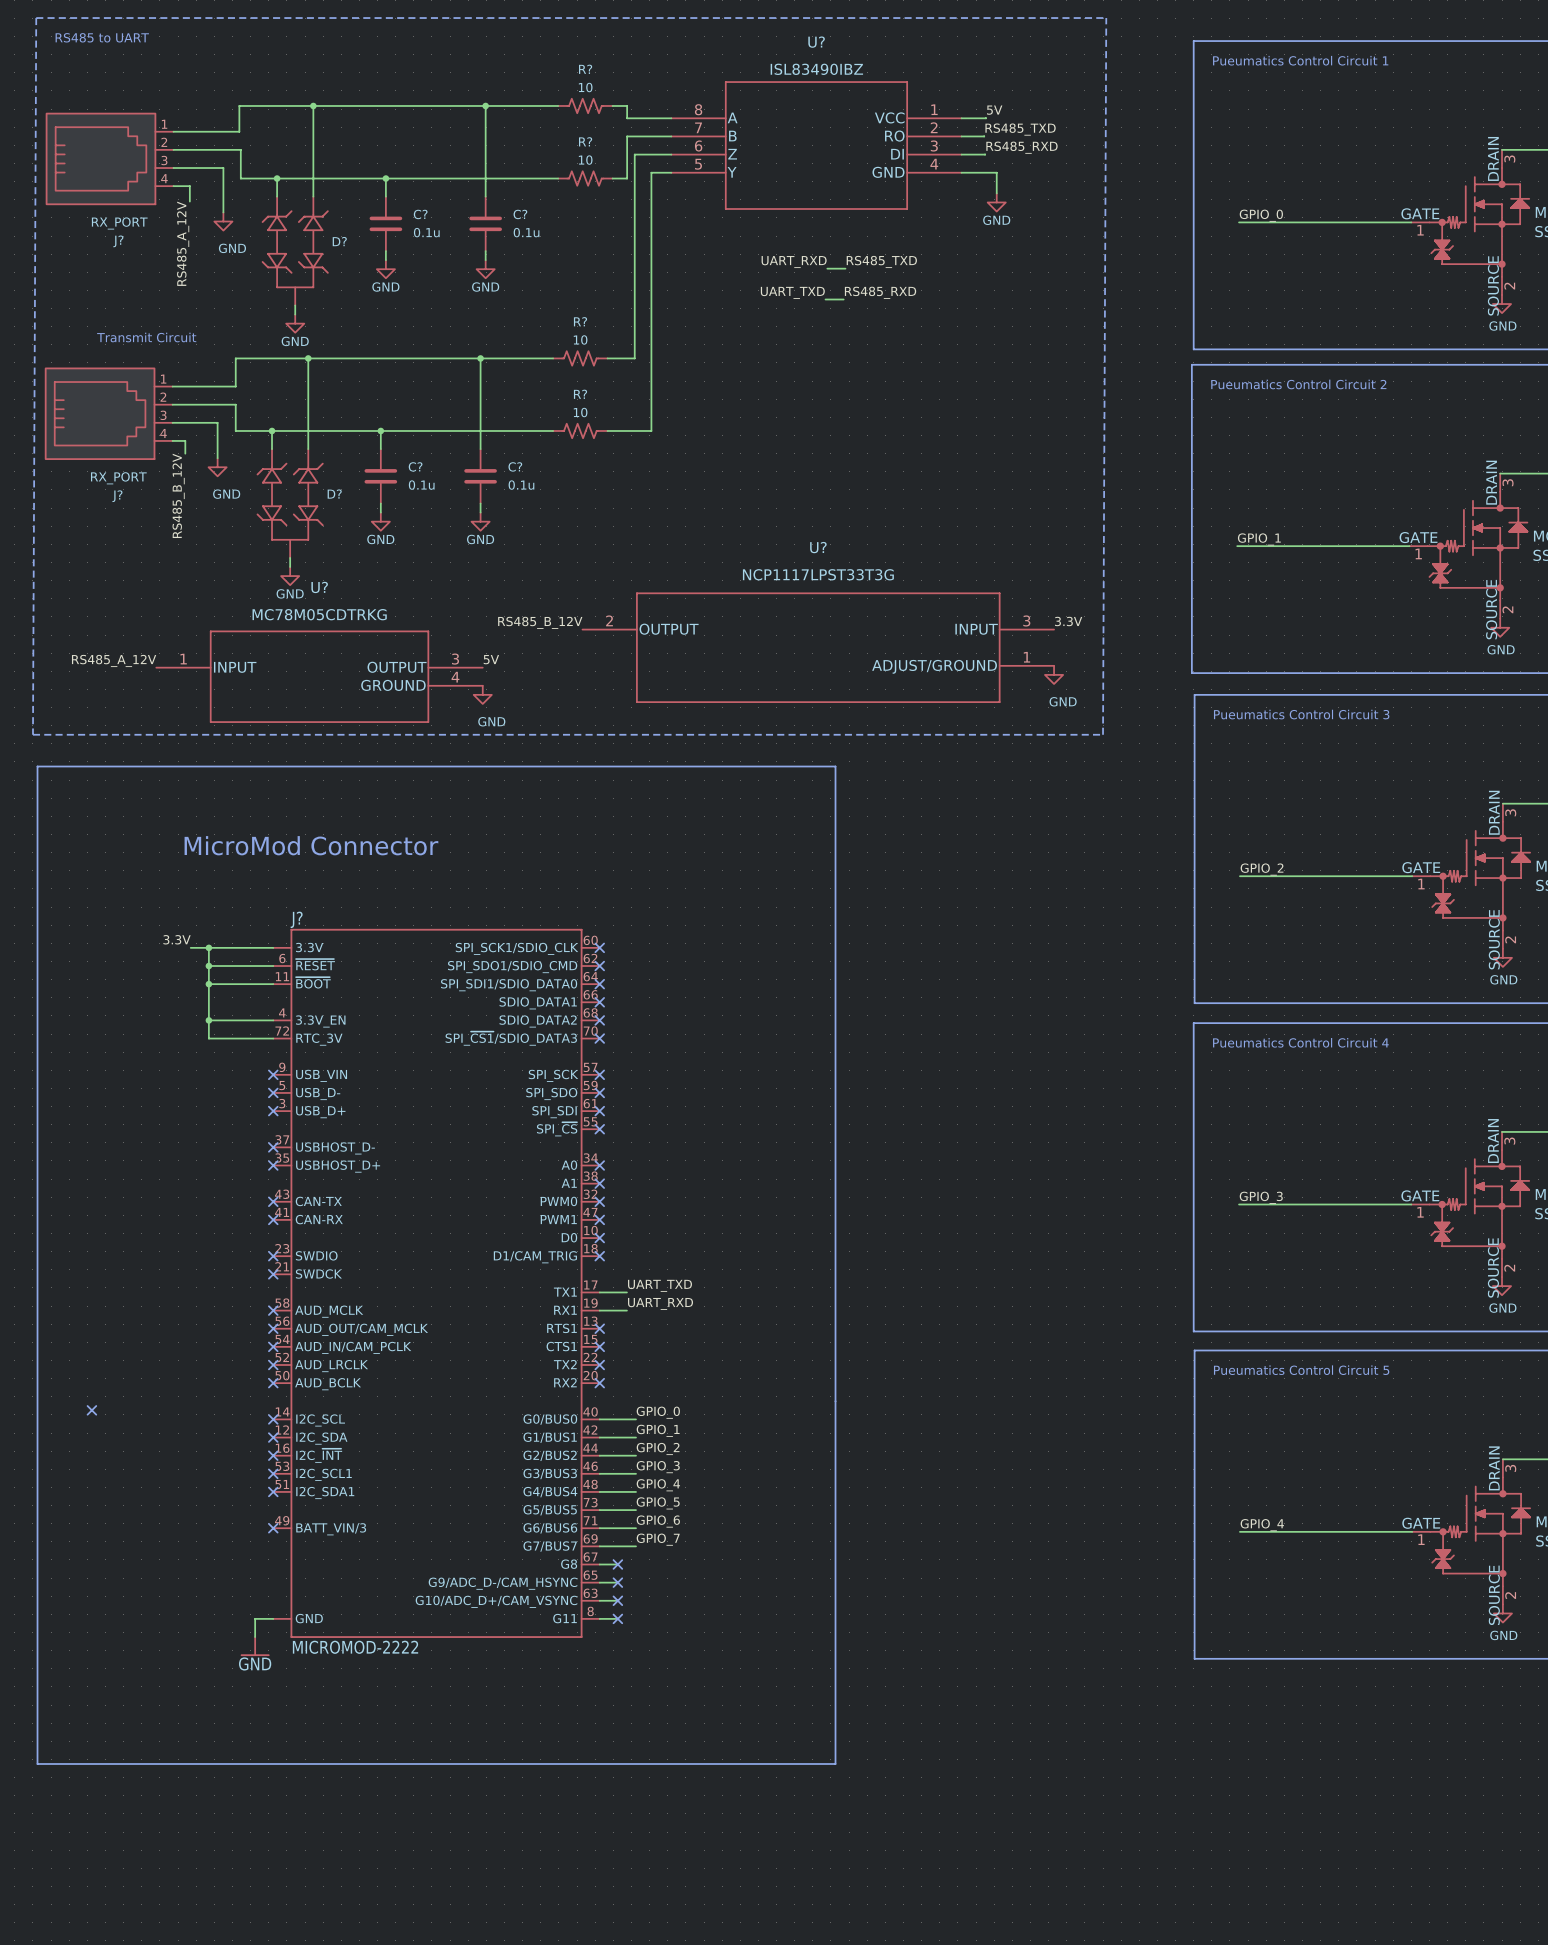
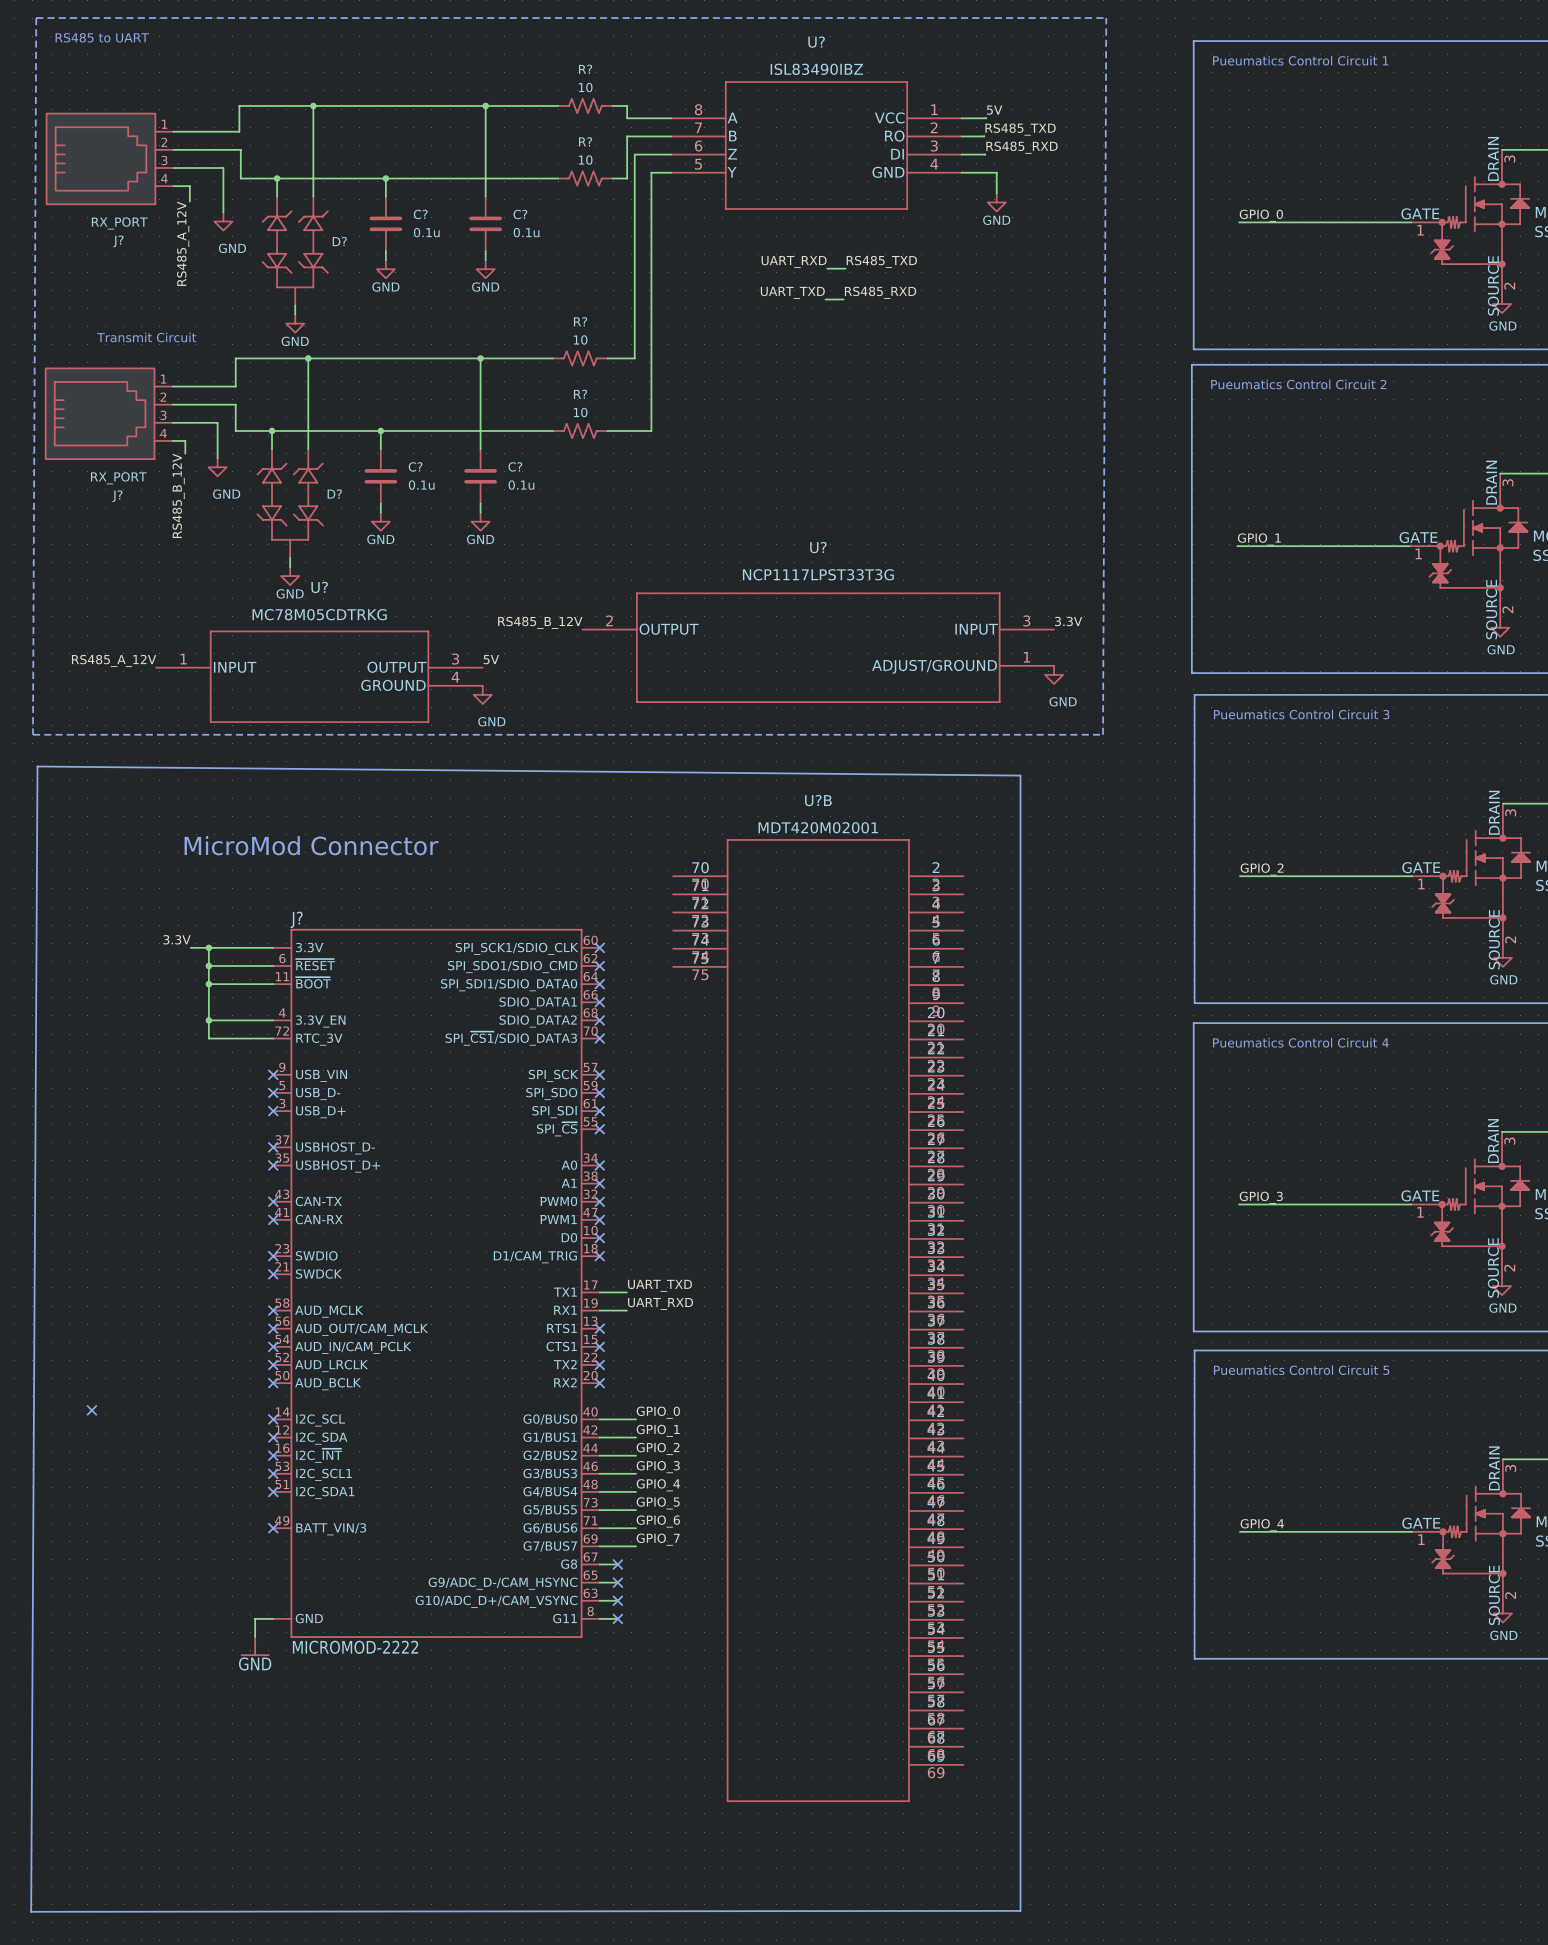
line: (37, 766) (37, 1764) (835, 1764) (835, 766) (37, 766) -> (37, 766) (31, 1911) (1020, 1910) (1020, 775) (37, 766)
U?B: none -> MDT420M02001 (818, 1320)

